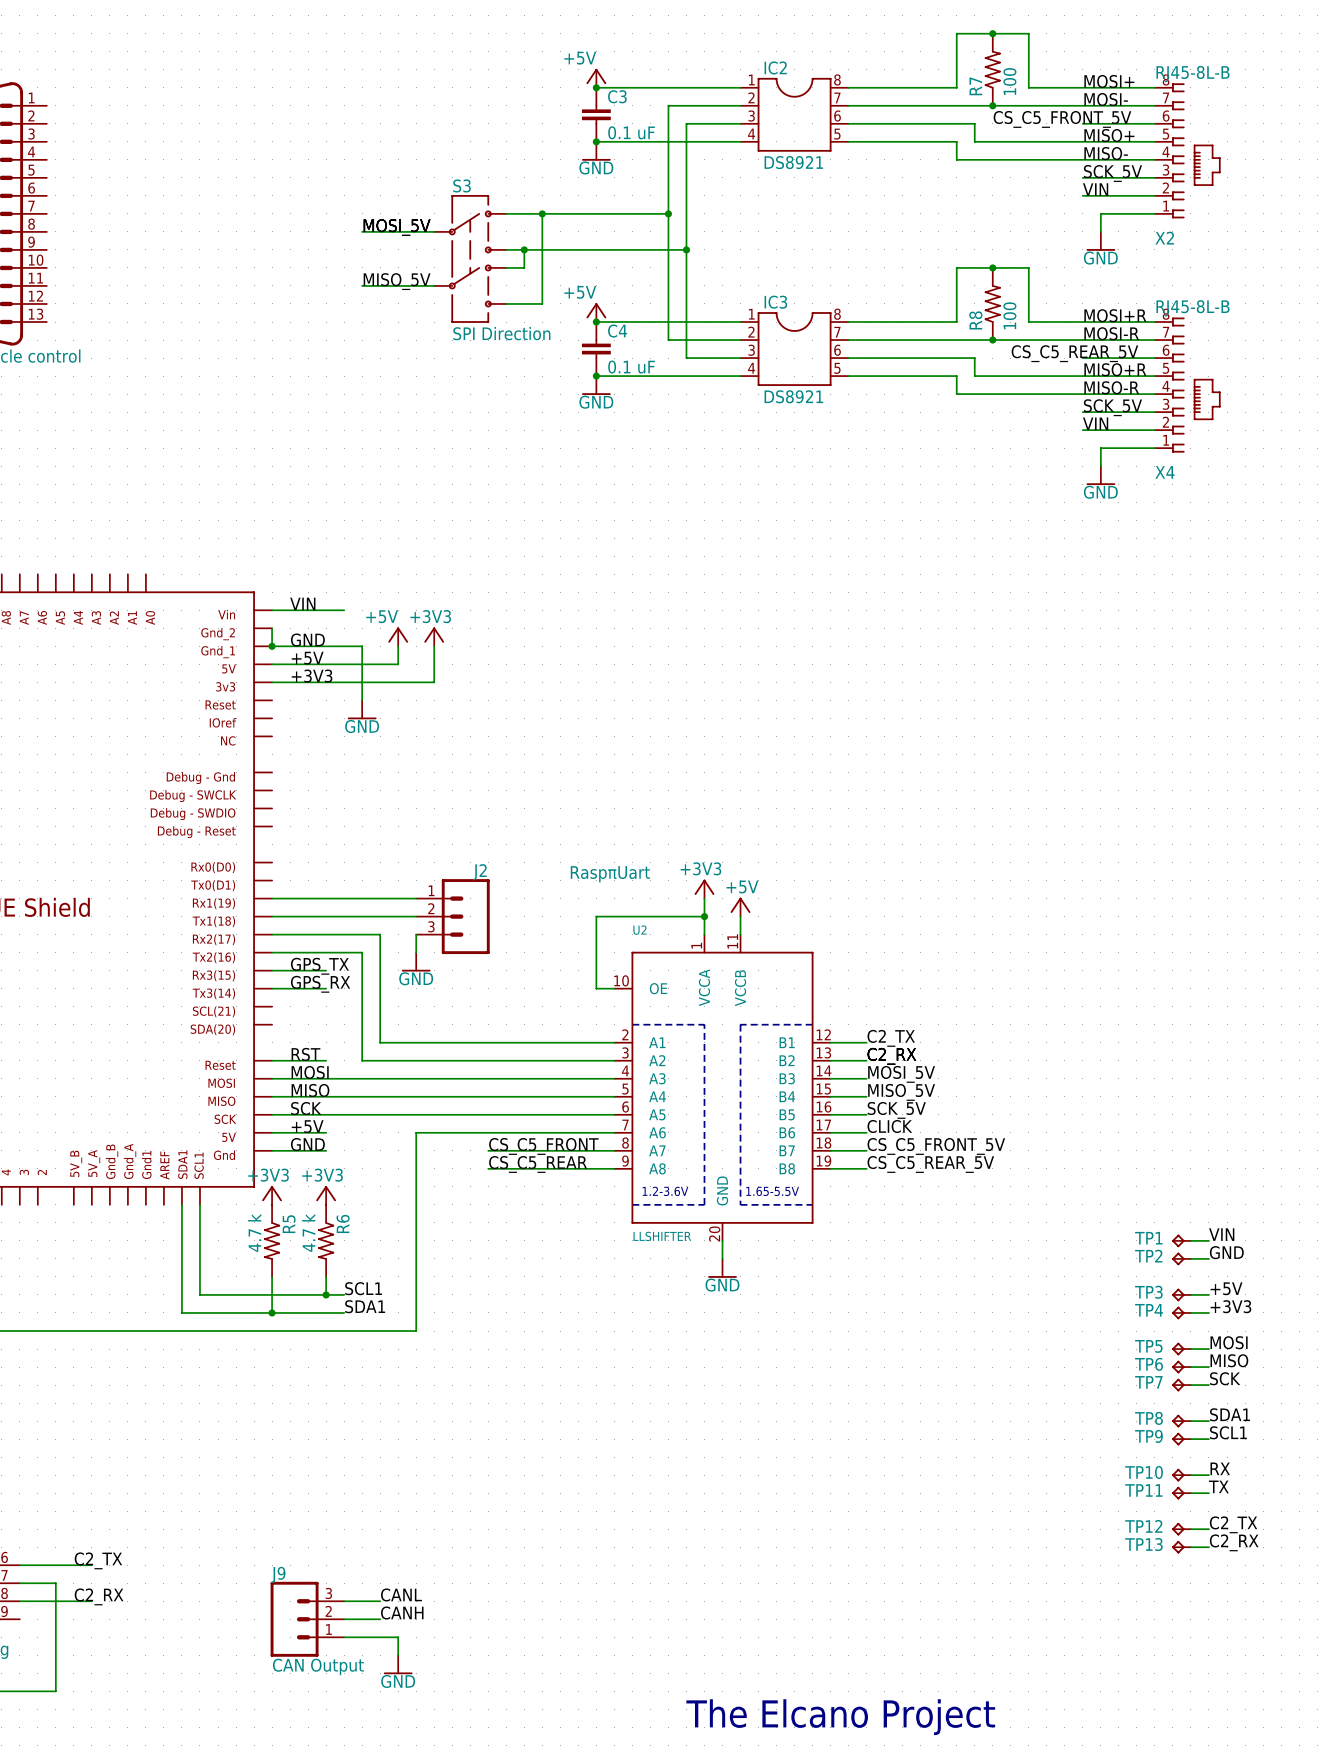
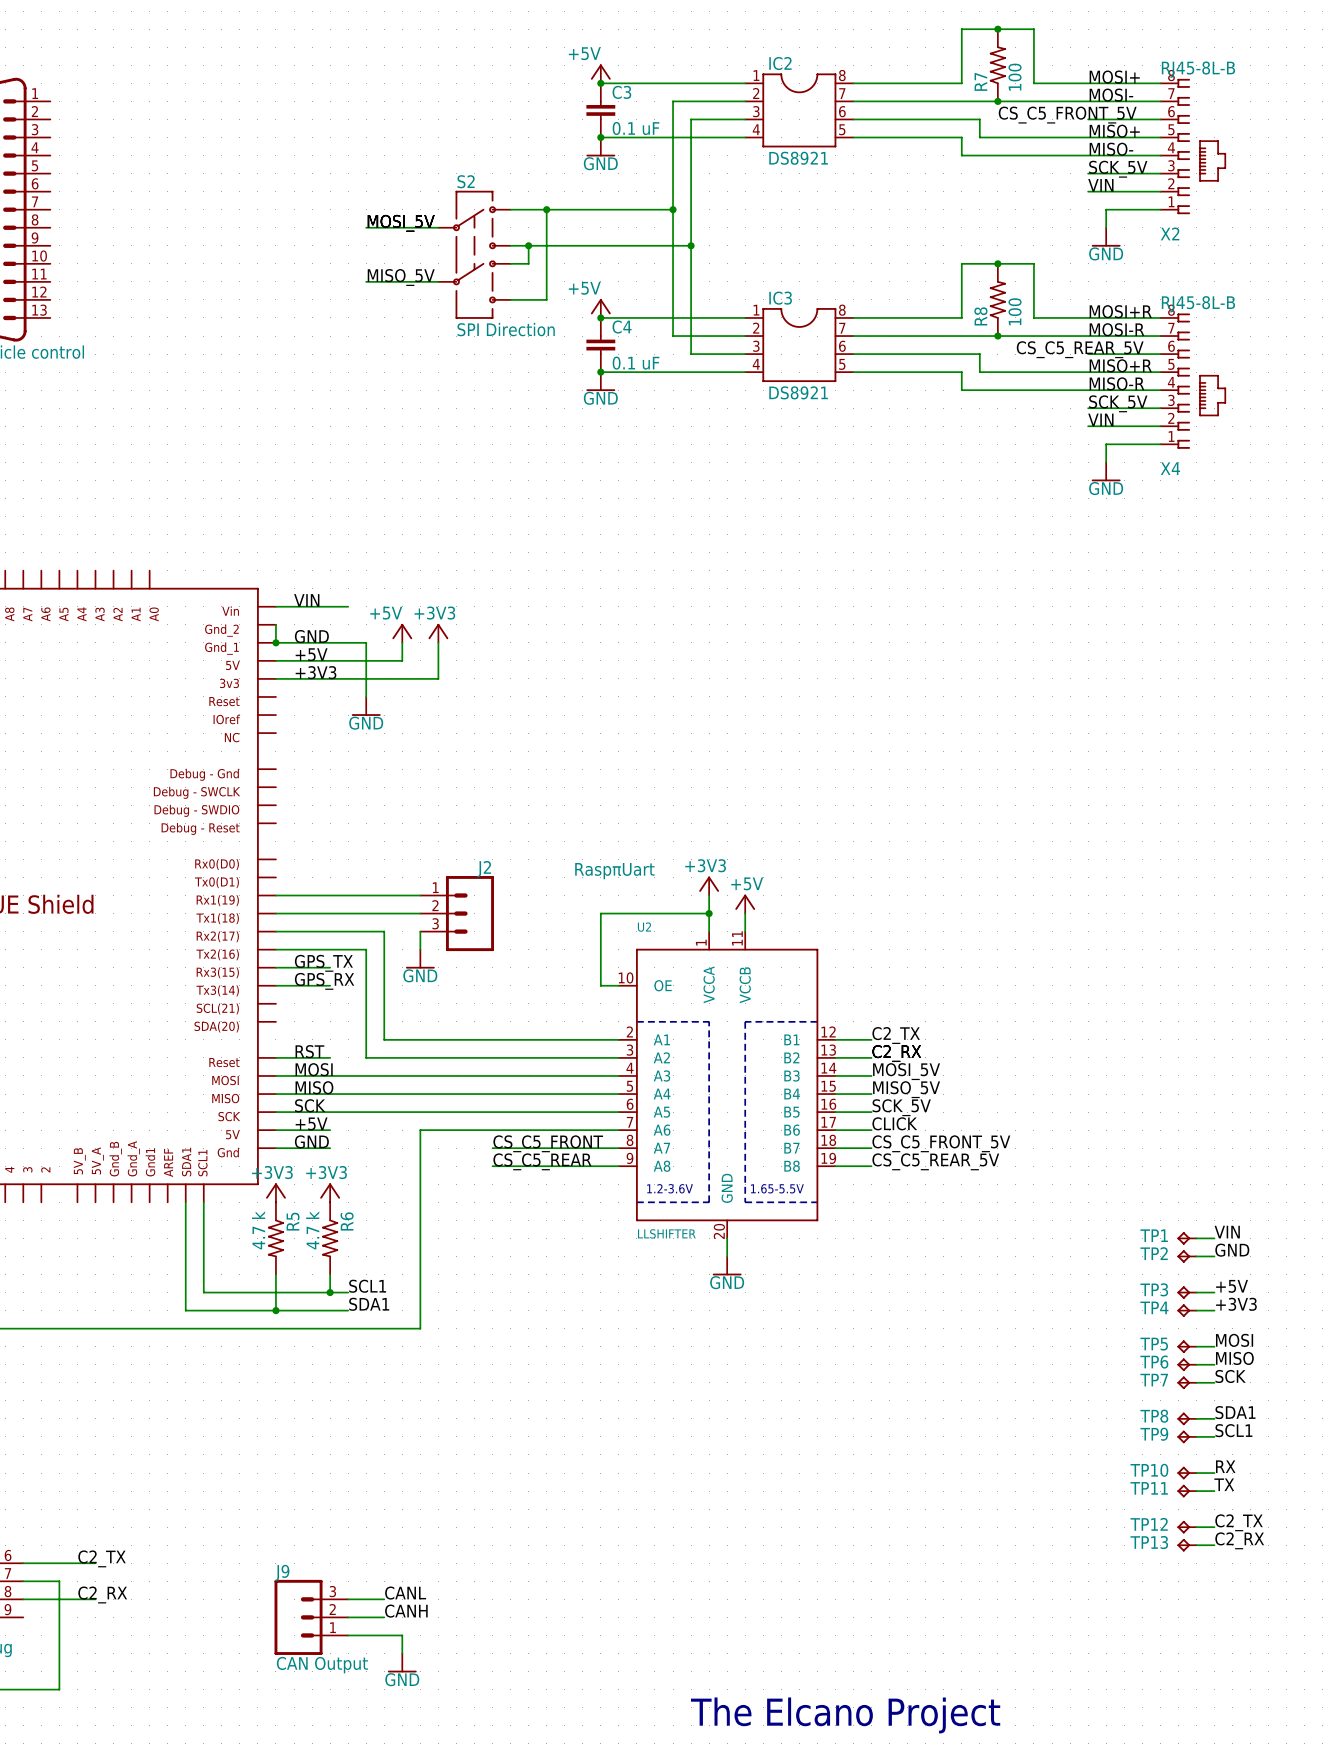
S3 name: S3 (462, 185) -> S2 (466, 181)

